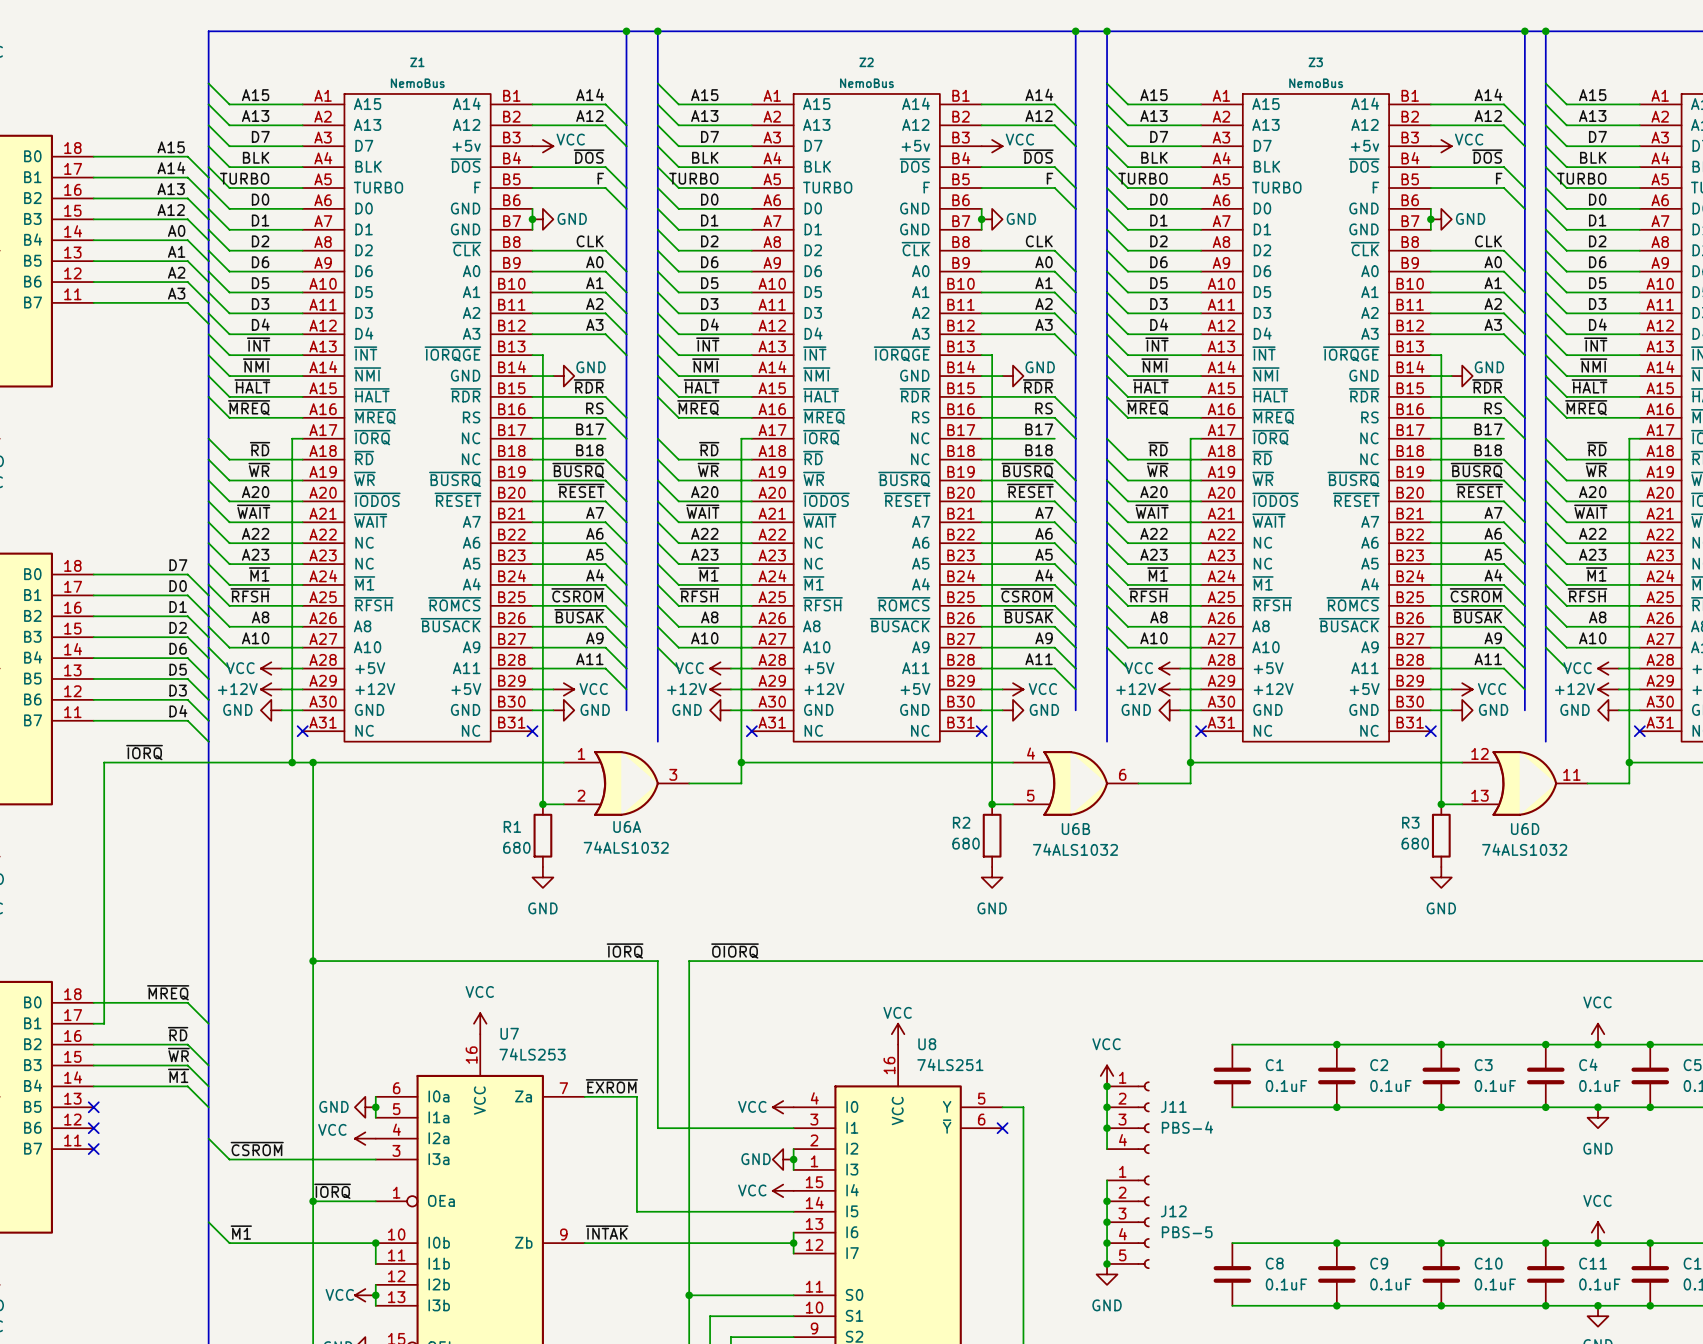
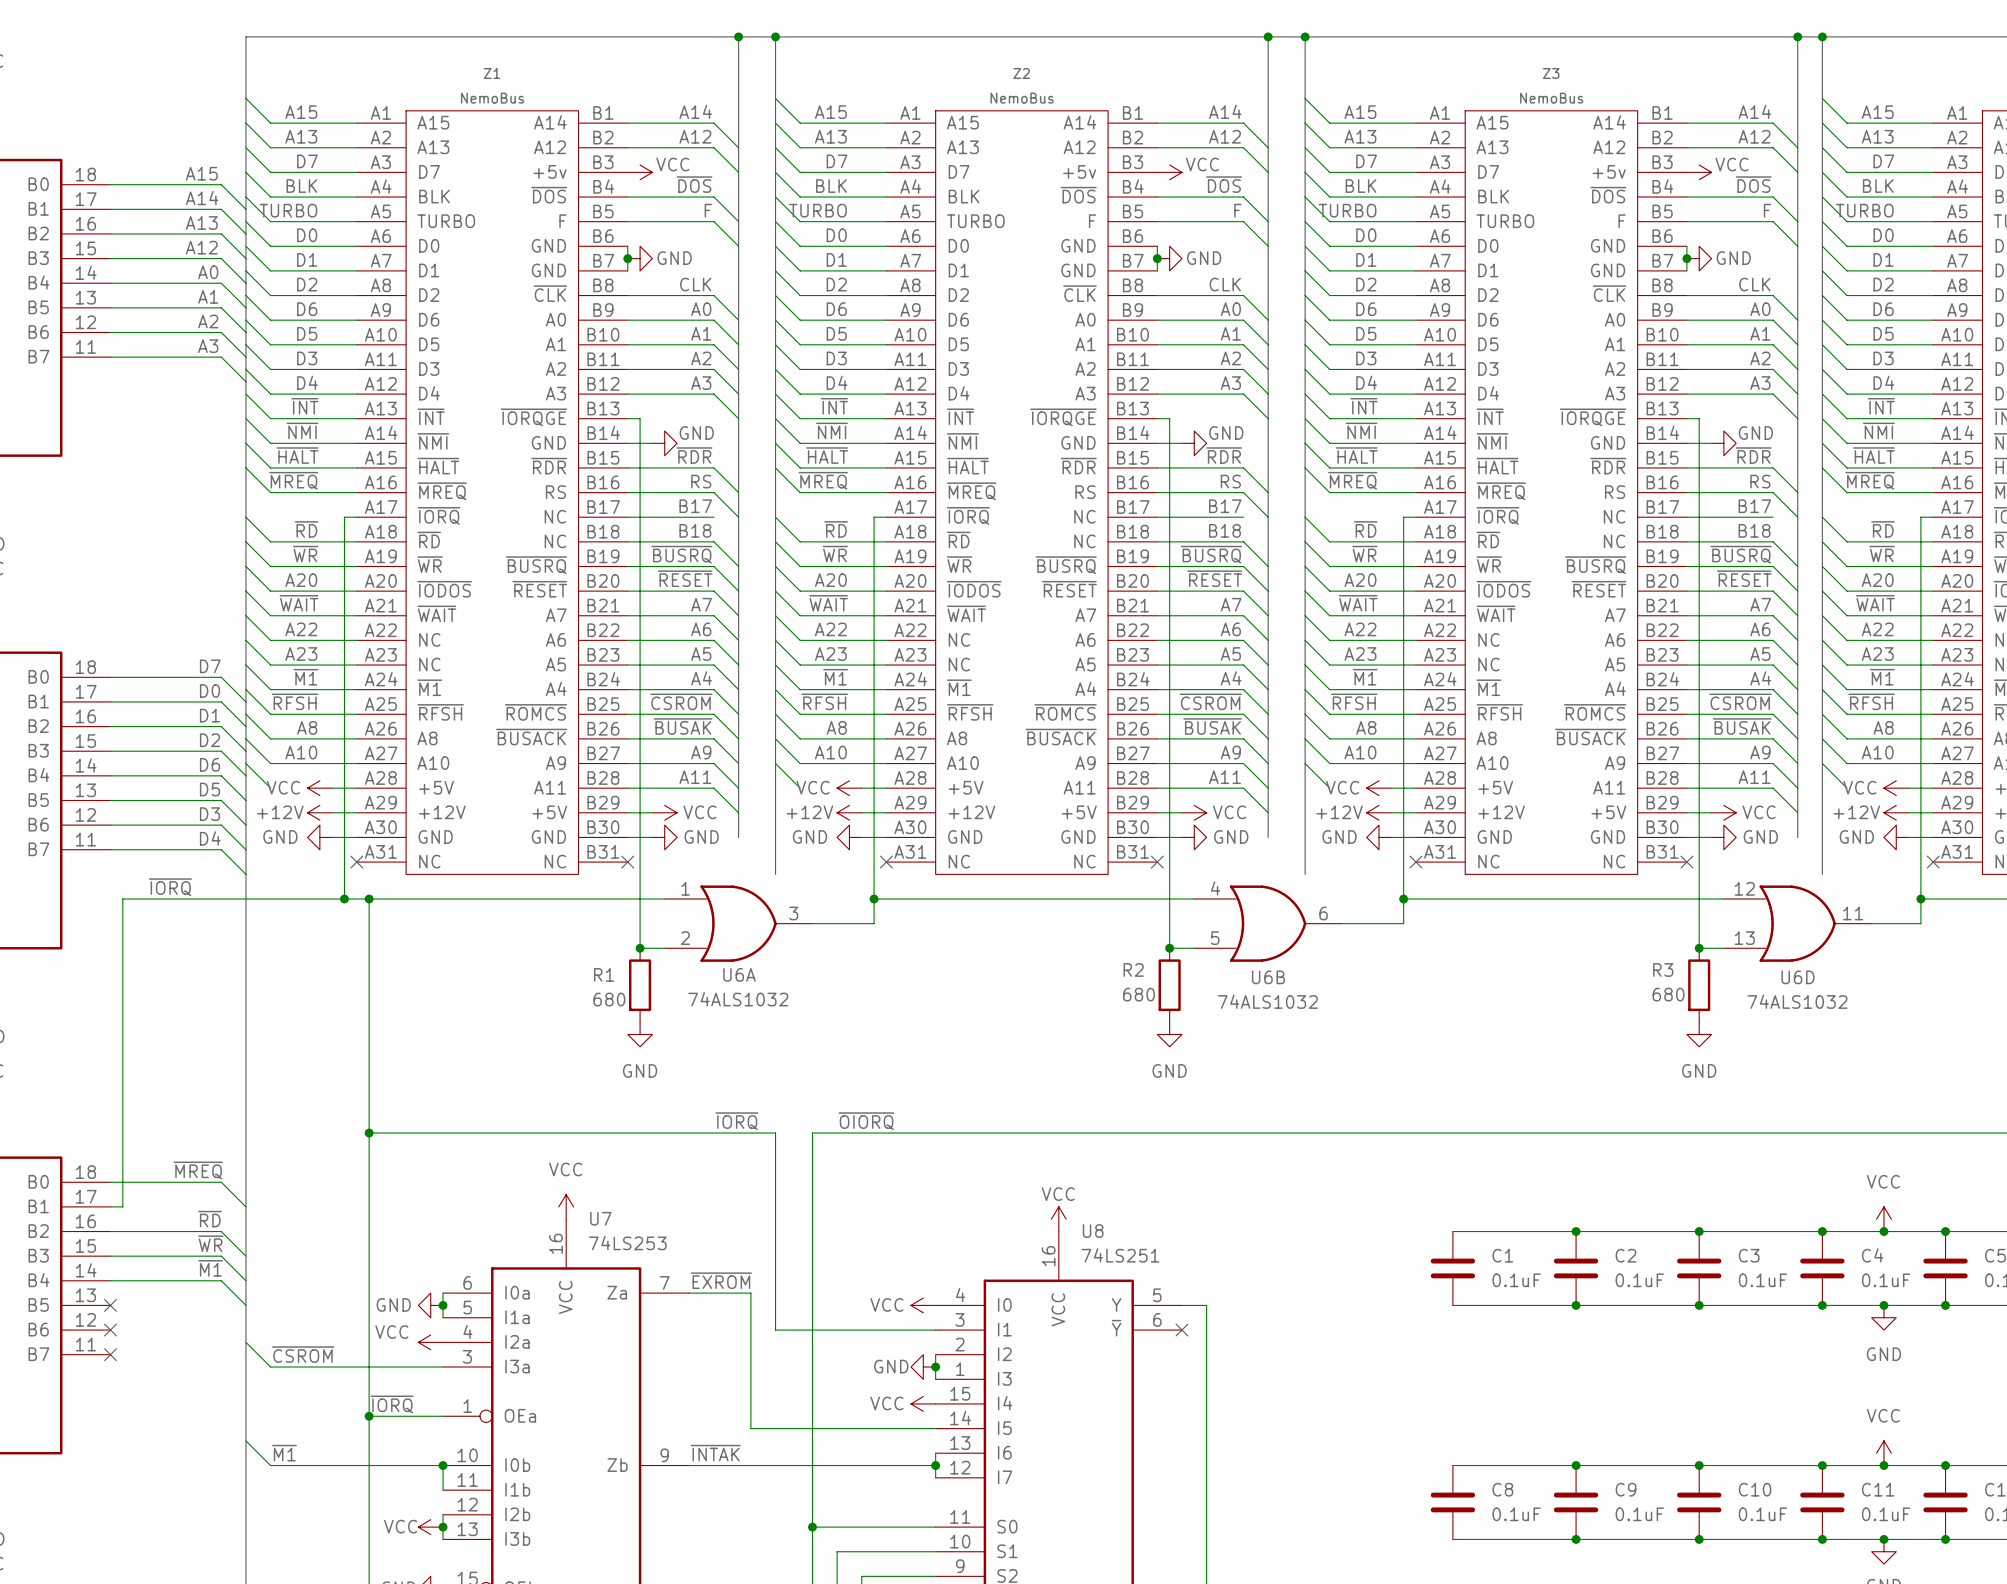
power symbol: VCC (1107, 1075) -> none
wire: (1107, 1086) (1107, 1149) -> none
junction: (1107, 1086) -> none
junction: (1107, 1107) -> none
J11: PBS-4 (1128, 1117) -> none
junction: (1107, 1128) -> none
wire: (1107, 1180) (1107, 1263) -> none
junction: (1107, 1201) -> none
junction: (1107, 1222) -> none
J12: PBS-5 (1128, 1222) -> none
junction: (1107, 1243) -> none
junction: (1107, 1263) -> none
power symbol: GND (1107, 1274) -> none

